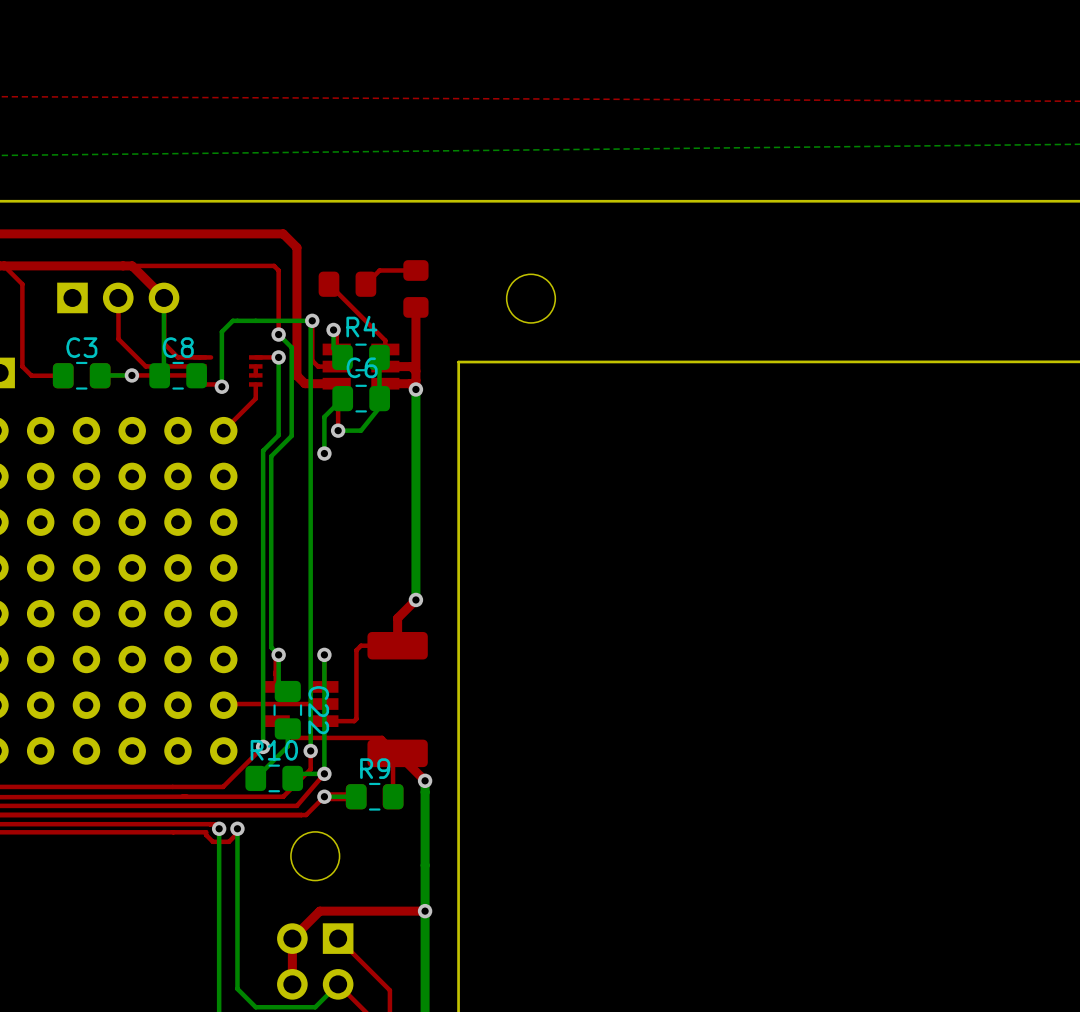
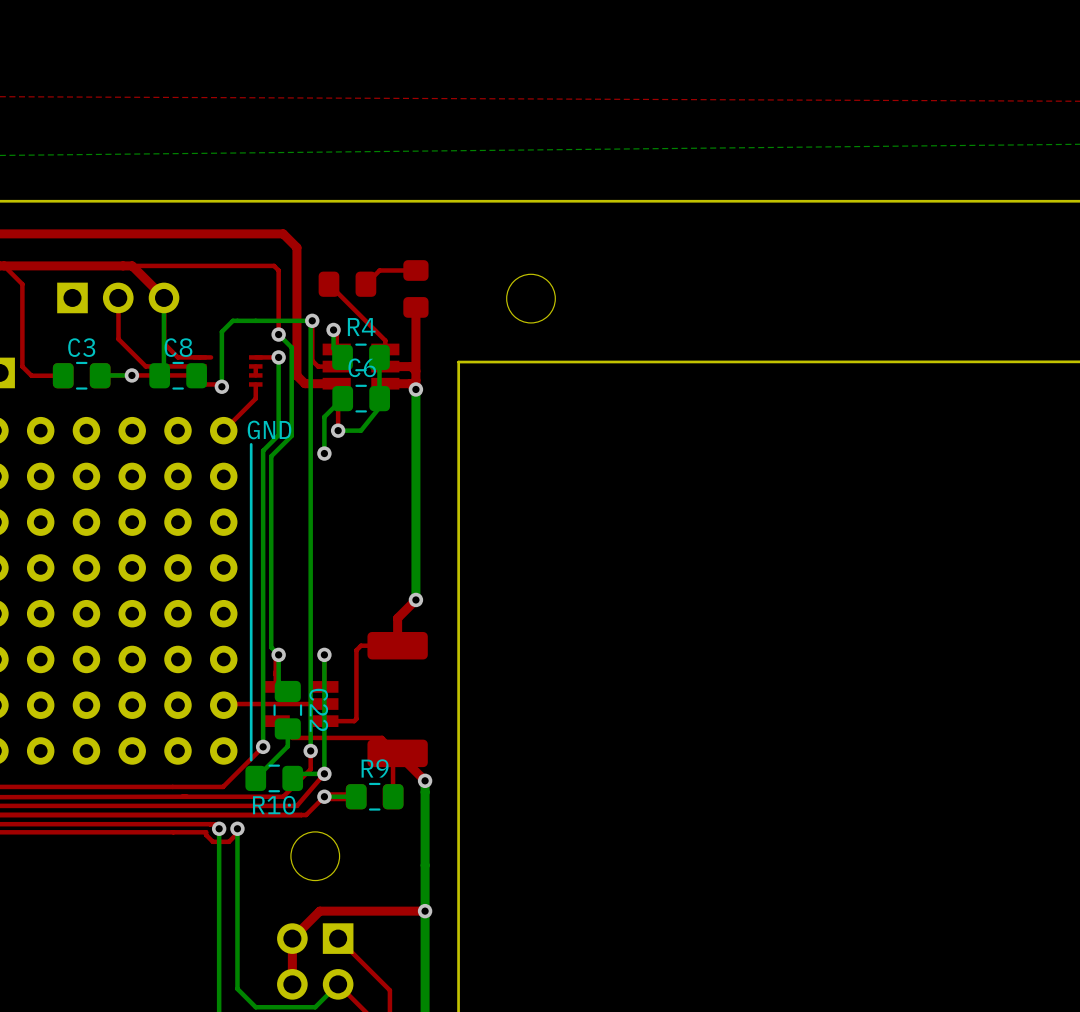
text: none -> GND (269, 429)
line: none -> (251, 444) (251, 760)
R10 name position: R10 (274, 750) -> R10 (274, 805)

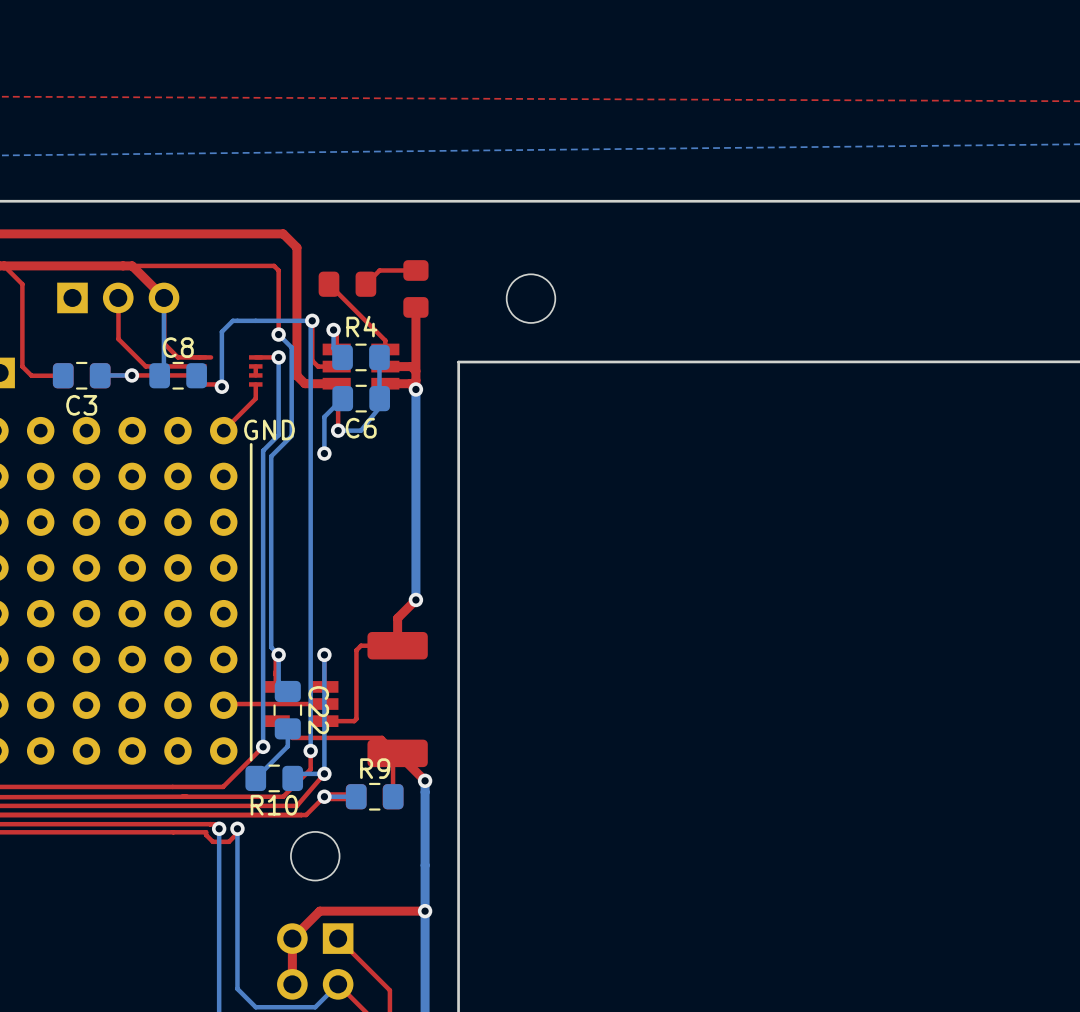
C3 name position: C3 (81, 347) -> C3 (81, 405)
C6 name position: C6 (362, 367) -> C6 (361, 428)

